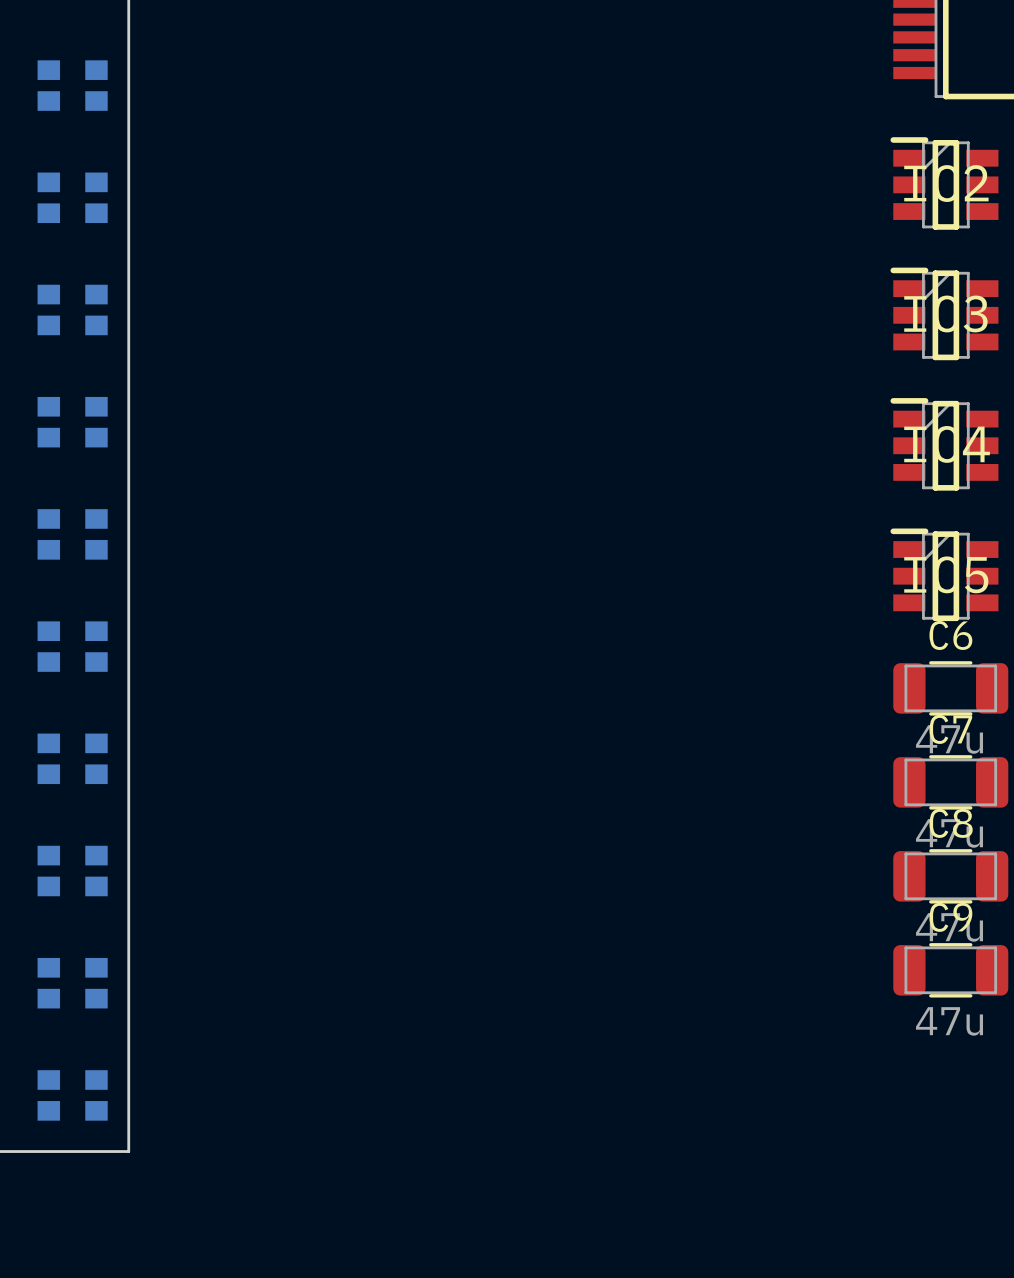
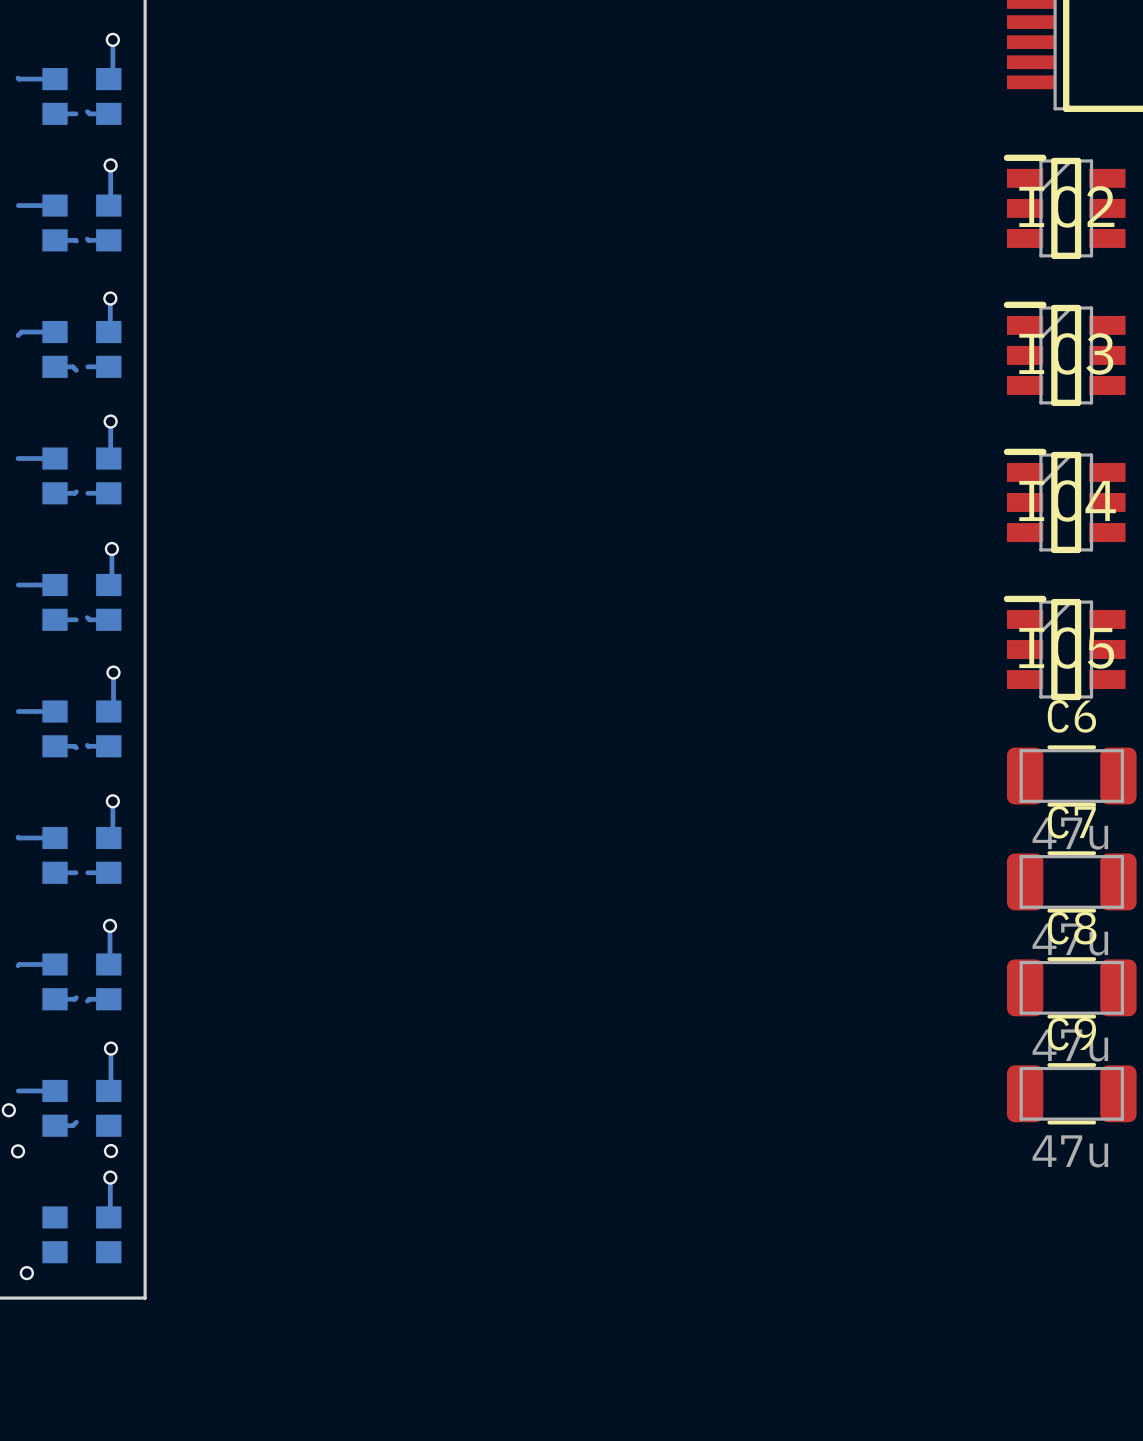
bottom track: none -> (112, 39) (112, 74) (108, 79)
via: none -> (112, 39)
bottom track: none -> (18, 78) (55, 79)
bottom track: none -> (87, 111) (89, 113) (108, 113)
bottom track: none -> (55, 113) (76, 113)
bottom track: none -> (110, 165) (110, 203) (108, 205)
via: none -> (110, 165)
bottom track: none -> (18, 205) (55, 205)
bottom track: none -> (87, 239) (108, 240)
bottom track: none -> (55, 240) (76, 240)
bottom track: none -> (110, 298) (110, 330) (108, 332)
via: none -> (110, 298)
bottom track: none -> (55, 332) (21, 332) (18, 335)
bottom track: none -> (55, 366) (72, 366) (76, 370)
bottom track: none -> (87, 366) (108, 366)
bottom track: none -> (110, 421) (110, 456) (108, 458)
via: none -> (110, 421)
bottom track: none -> (18, 458) (55, 458)
bottom track: none -> (76, 491) (55, 493)
bottom track: none -> (87, 493) (108, 493)
bottom track: none -> (111, 548) (111, 581) (108, 585)
via: none -> (111, 548)
bottom track: none -> (18, 585) (55, 585)
bottom track: none -> (87, 617) (89, 619) (108, 619)
bottom track: none -> (55, 619) (76, 619)
bottom track: none -> (113, 672) (113, 706) (108, 711)
via: none -> (113, 672)
bottom track: none -> (18, 711) (55, 711)
bottom track: none -> (87, 745) (108, 746)
bottom track: none -> (55, 746) (76, 747)
bottom track: none -> (112, 801) (112, 833) (108, 837)
via: none -> (112, 801)
bottom track: none -> (18, 837) (55, 837)
bottom track: none -> (55, 872) (76, 872)
bottom track: none -> (87, 872) (108, 872)
bottom track: none -> (110, 925) (108, 964)
via: none -> (110, 925)
bottom track: none -> (55, 964) (18, 965)
bottom track: none -> (76, 997) (55, 999)
bottom track: none -> (108, 999) (89, 999) (87, 1001)
bottom track: none -> (110, 1048) (110, 1088) (108, 1090)
via: none -> (110, 1048)
bottom track: none -> (18, 1090) (55, 1090)
via: none -> (8, 1110)
bottom track: none -> (76, 1122) (72, 1125) (55, 1125)
via: none -> (18, 1151)
via: none -> (110, 1151)
bottom track: none -> (110, 1177) (110, 1215) (108, 1217)
via: none -> (110, 1177)
via: none -> (26, 1273)

